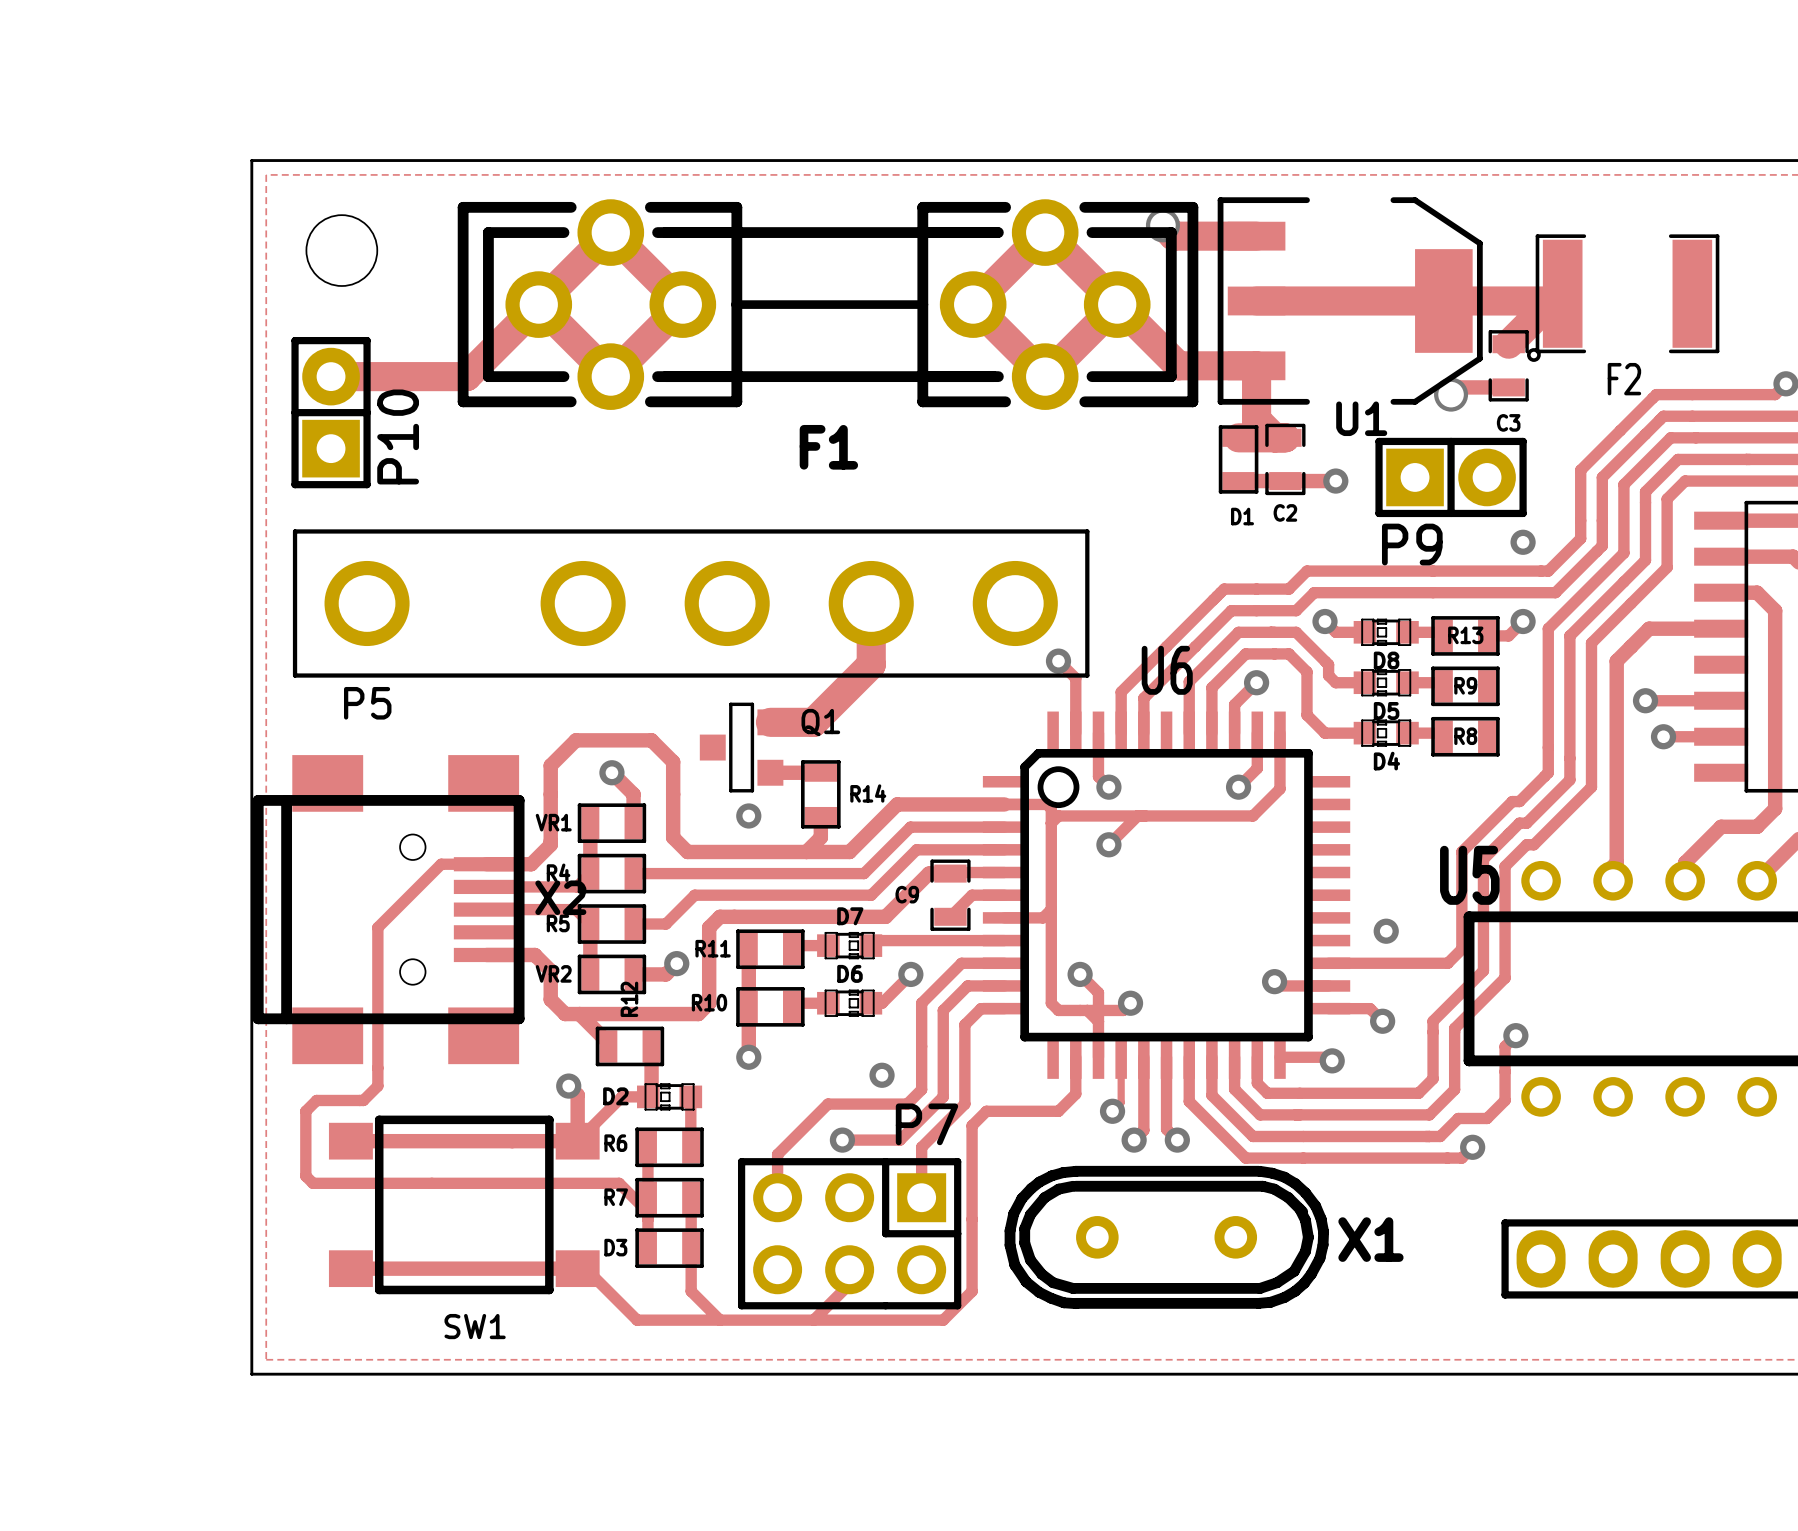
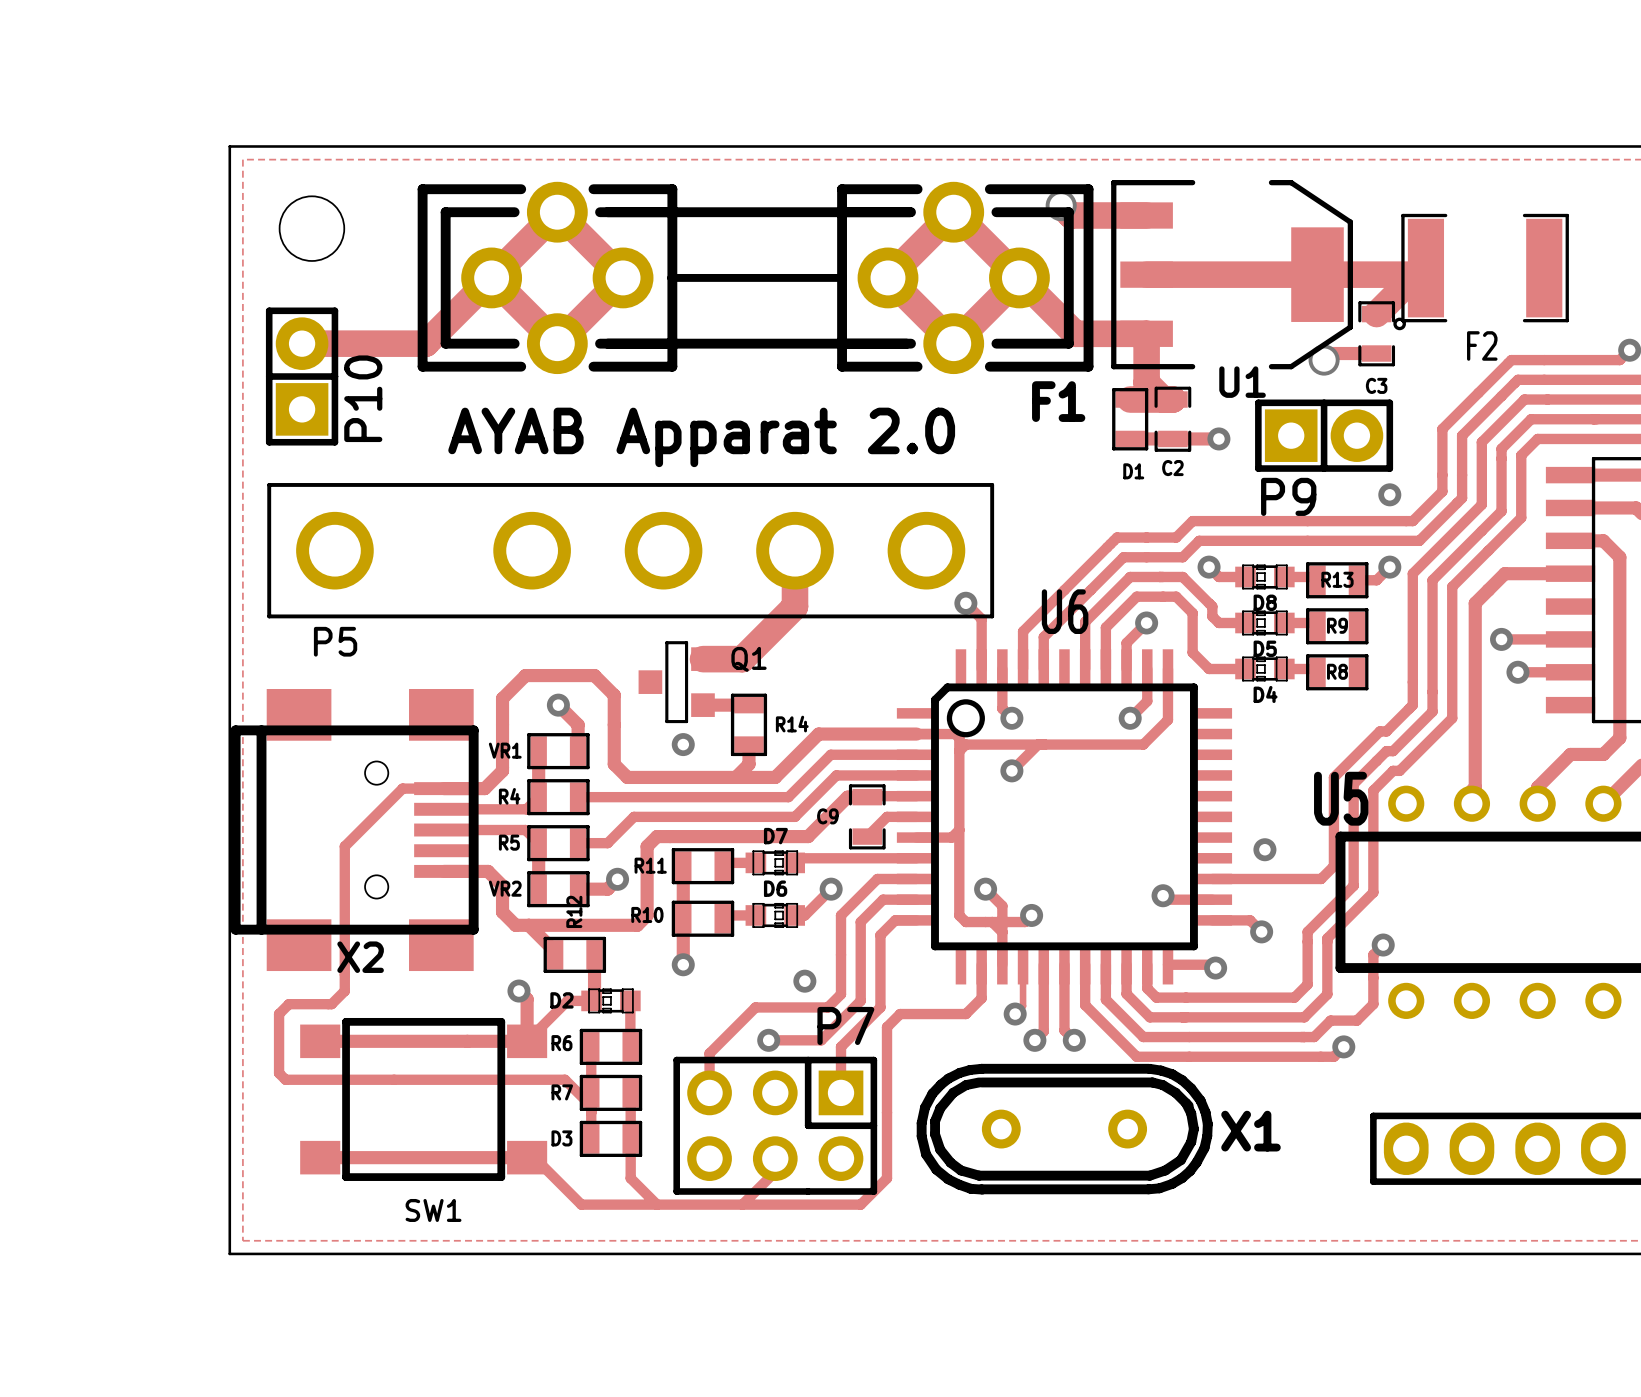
F1 name position: F1 (828, 447) -> F1 (1058, 401)
text: none -> AYAB Apparat 2.0 (701, 437)
X2 name position: X2 (560, 897) -> X2 (360, 957)

